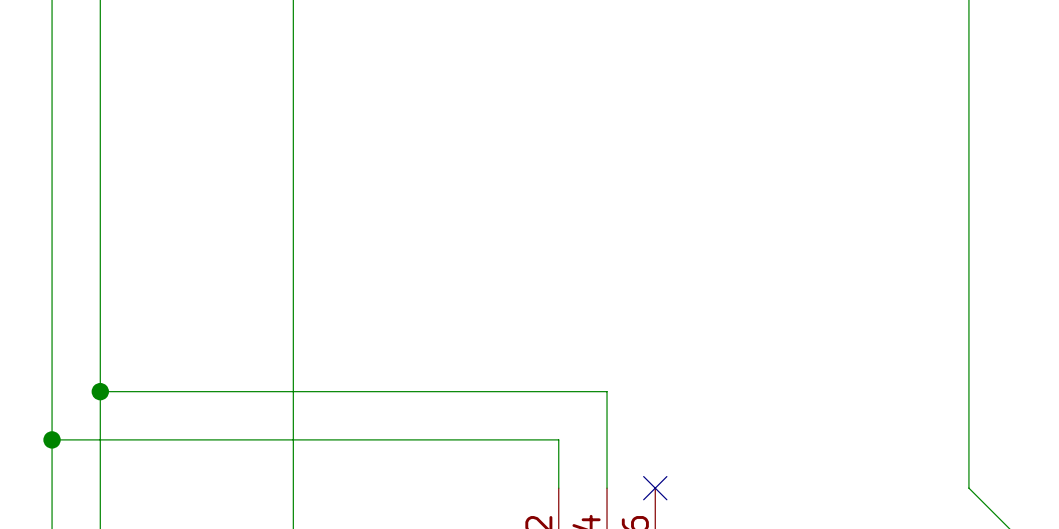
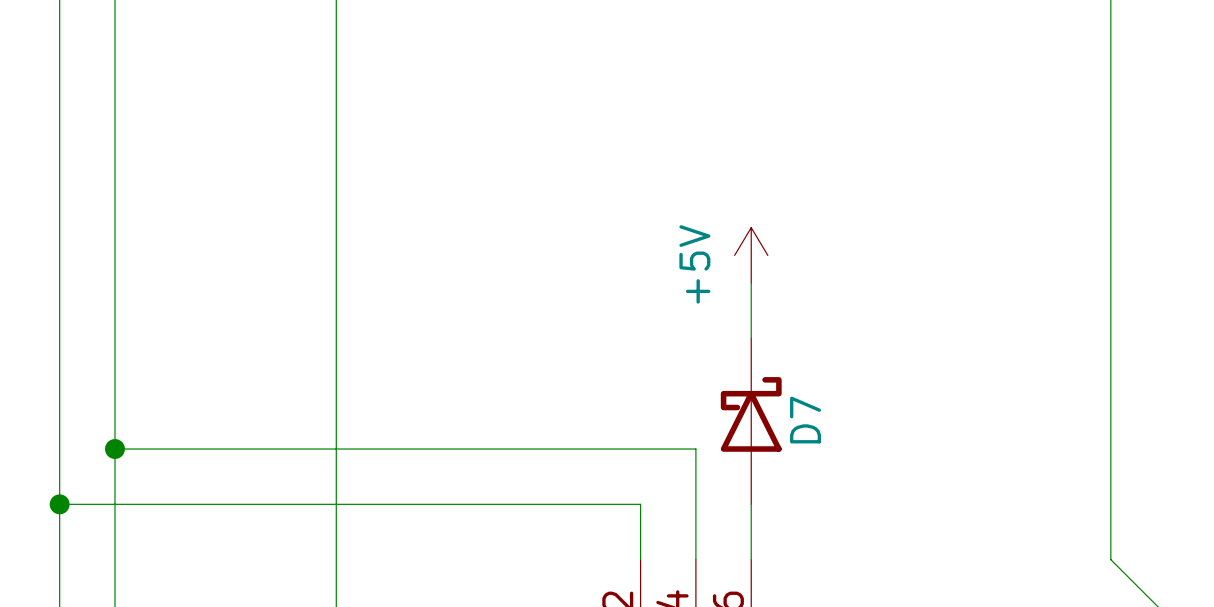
power symbol: none -> +5V (751, 255)
wire: none -> (751, 283) (751, 338)
D7: none -> (751, 421)
wire: none -> (751, 504) (751, 559)
no-connect mark: (655, 488) -> none

